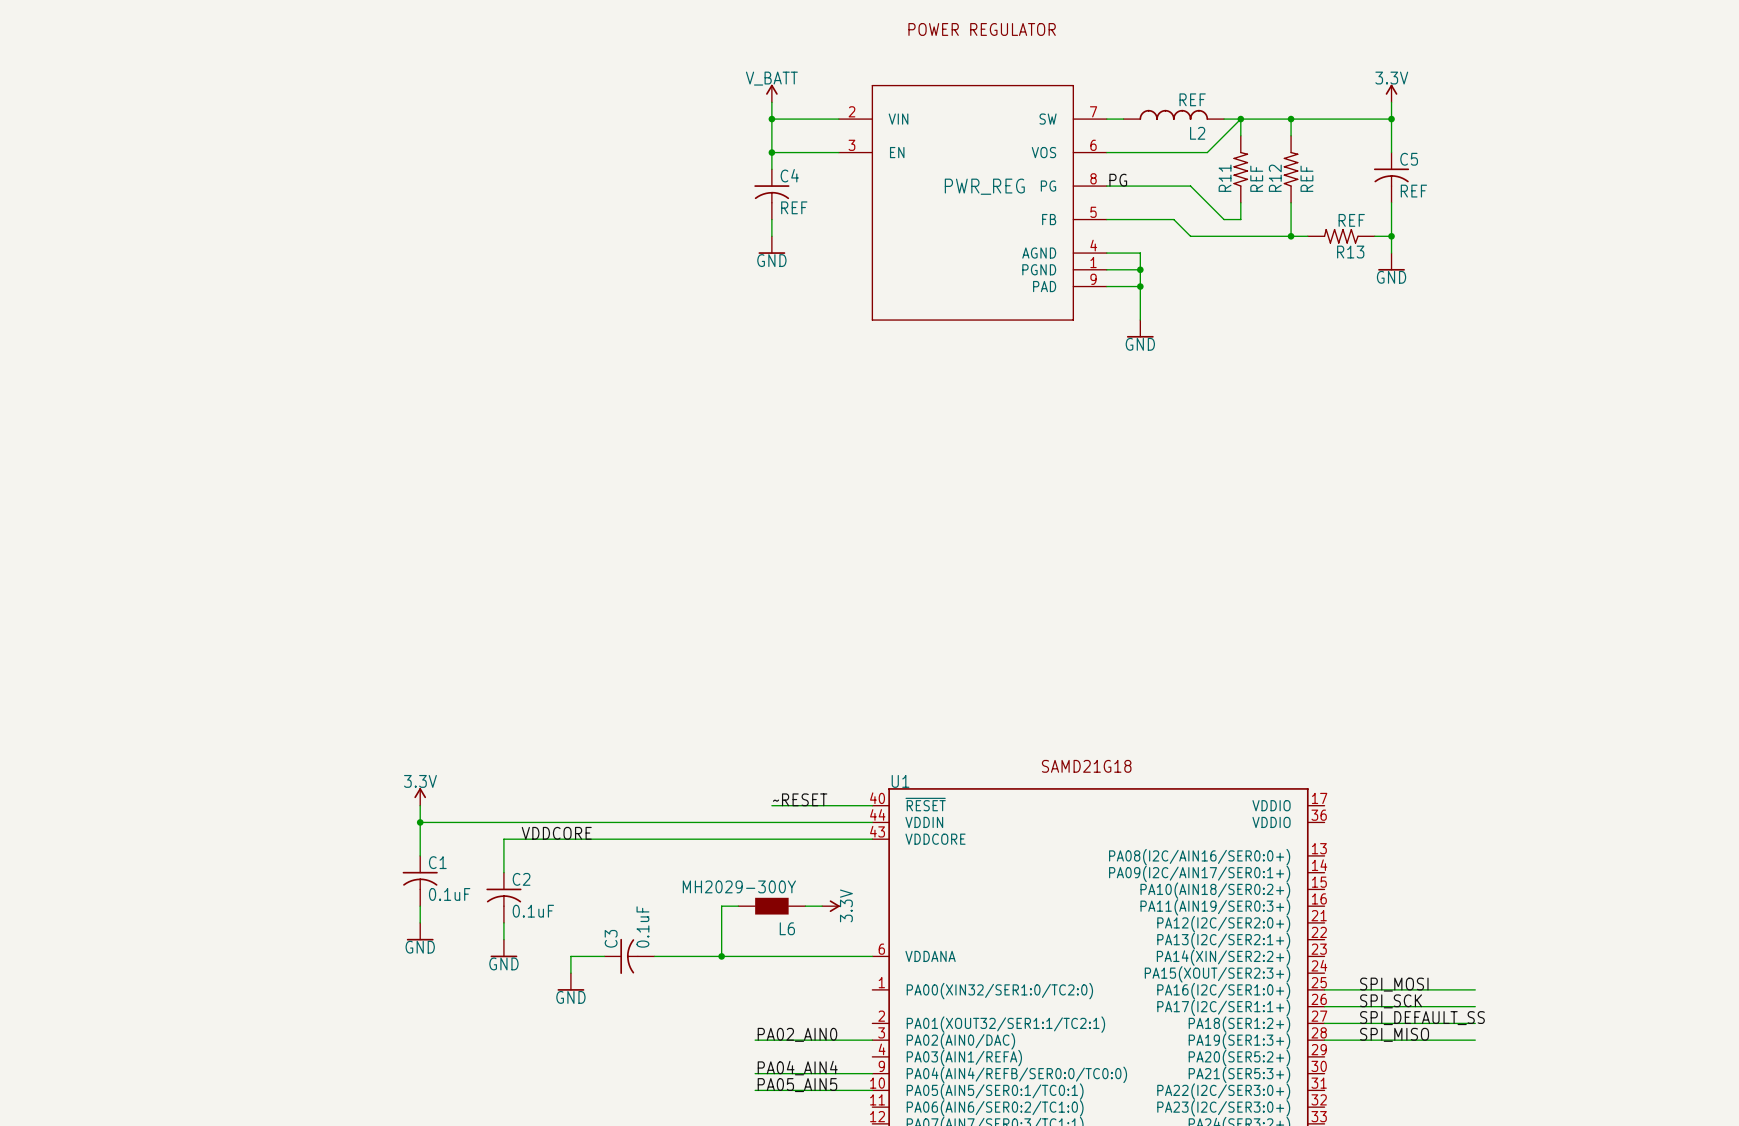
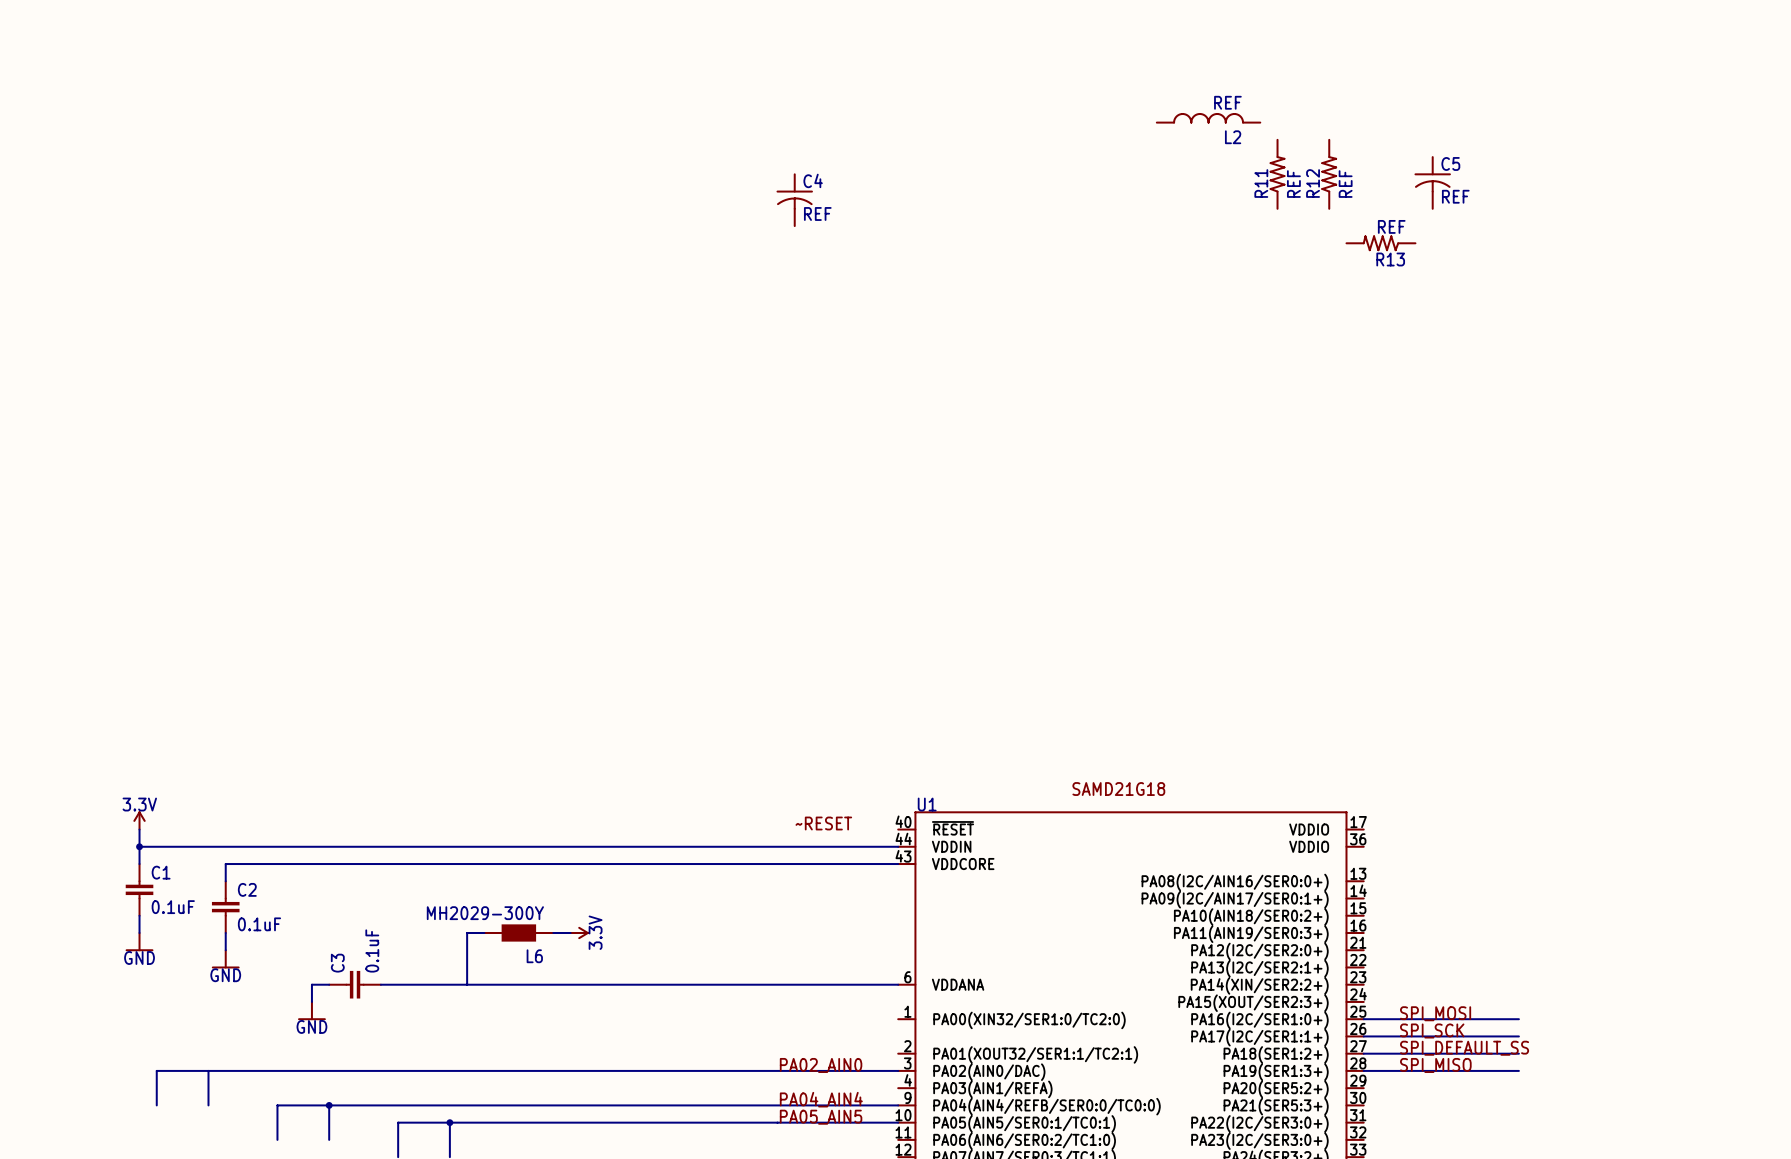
text: POWER REGULATOR (982, 29) -> none
power symbol: V_BATT (771, 93) -> none
power symbol: 3.3V (1391, 93) -> none
wire: (771, 102) (771, 169) -> none
wire: (1391, 102) (1391, 152) -> none
wire: (771, 119) (838, 119) -> none
junction: (771, 119) -> none
wire: (1106, 119) (1123, 119) -> none
wire: (1224, 119) (1391, 119) -> none
junction: (1240, 119) -> none
wire: (1291, 119) (1291, 135) -> none
junction: (1291, 119) -> none
junction: (1391, 119) -> none
wire: (1240, 135) (1240, 119) (1207, 152) (1106, 152) -> none
wire: (771, 152) (838, 152) -> none
junction: (771, 152) -> none
label: PG (1118, 180) -> none
wire: (1106, 186) (1190, 186) (1224, 219) (1240, 219) (1240, 202) -> none
PWR_REG: (972, 202) -> none
wire: (1291, 202) (1291, 236) -> none
wire: (1391, 202) (1391, 253) -> none
wire: (771, 219) (771, 236) -> none
wire: (1106, 219) (1173, 219) (1190, 236) (1307, 236) -> none
junction: (1291, 236) -> none
wire: (1374, 236) (1391, 236) -> none
junction: (1391, 236) -> none
power symbol: GND (771, 245) -> none
wire: (1106, 253) (1140, 253) (1140, 320) -> none
power symbol: GND (1391, 261) -> none
wire: (1106, 269) (1140, 269) -> none
junction: (1140, 269) -> none
wire: (1106, 286) (1140, 286) -> none
junction: (1140, 286) -> none
power symbol: GND (1140, 328) -> none
power symbol: none -> 3.3V (139, 820)
power symbol: 3.3V (420, 796) -> none
wire: none -> (139, 829) (139, 864)
wire: (420, 805) (420, 855) -> none
wire: (771, 805) (872, 805) -> none
wire: none -> (139, 846) (432, 846)
junction: none -> (139, 846)
junction: (420, 822) -> none
label: VDDCORE (556, 833) -> none
wire: (503, 839) (503, 872) -> (518, 864) (225, 864) (225, 881)
C1 symbol: [402, 855, 438, 907] -> [125, 864, 154, 916]
C2 symbol: [486, 872, 522, 923] -> [211, 881, 240, 933]
wire: none -> (139, 915) (139, 932)
wire: none -> (225, 932) (225, 950)
wire: (420, 906) (420, 922) -> none
wire: none -> (484, 932) (467, 932) (467, 984)
wire: none -> (553, 932) (570, 932)
power symbol: none -> 3.3V (579, 932)
wire: (738, 906) (721, 906) (721, 956) -> none
L6 position: (771, 906) -> (518, 932)
wire: (805, 906) (822, 906) -> none
power symbol: 3.3V (830, 906) -> none
power symbol: none -> GND (139, 942)
wire: (503, 922) (503, 939) -> none
power symbol: none -> GND (225, 959)
power symbol: GND (420, 931) -> none
C3 symbol: [604, 938, 655, 975] -> [329, 970, 381, 999]
power symbol: GND (503, 948) -> none
wire: none -> (329, 984) (311, 984) (311, 1001)
wire: (570, 956) (570, 973) -> (587, 984) (380, 984)
junction: (721, 956) -> none
power symbol: none -> GND (311, 1011)
power symbol: GND (570, 981) -> none
wire: none -> (208, 1070) (208, 1105)
wire: none -> (777, 1070) (156, 1070) (156, 1105)
wire: none -> (329, 1105) (329, 1139)
junction: none -> (329, 1105)
wire: none -> (777, 1105) (277, 1105) (277, 1139)
wire: none -> (449, 1122) (449, 1157)
junction: none -> (449, 1122)
wire: none -> (777, 1122) (398, 1122) (398, 1157)

